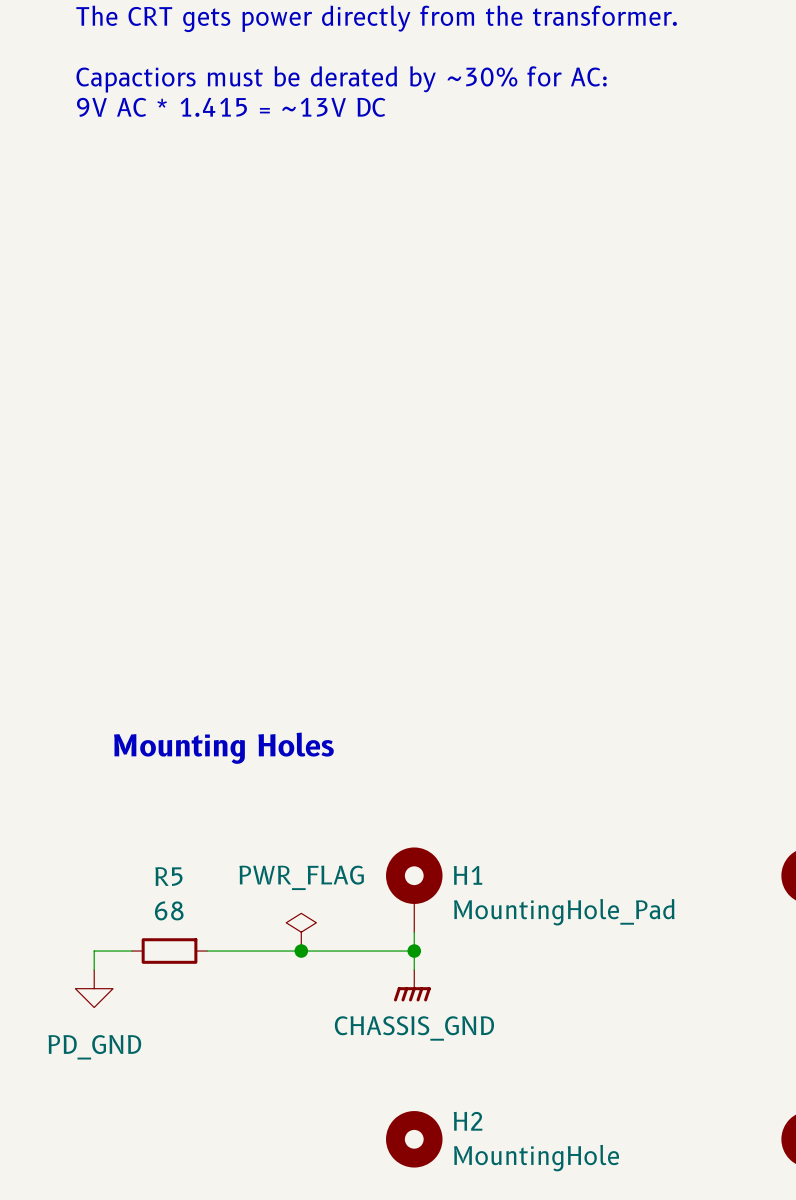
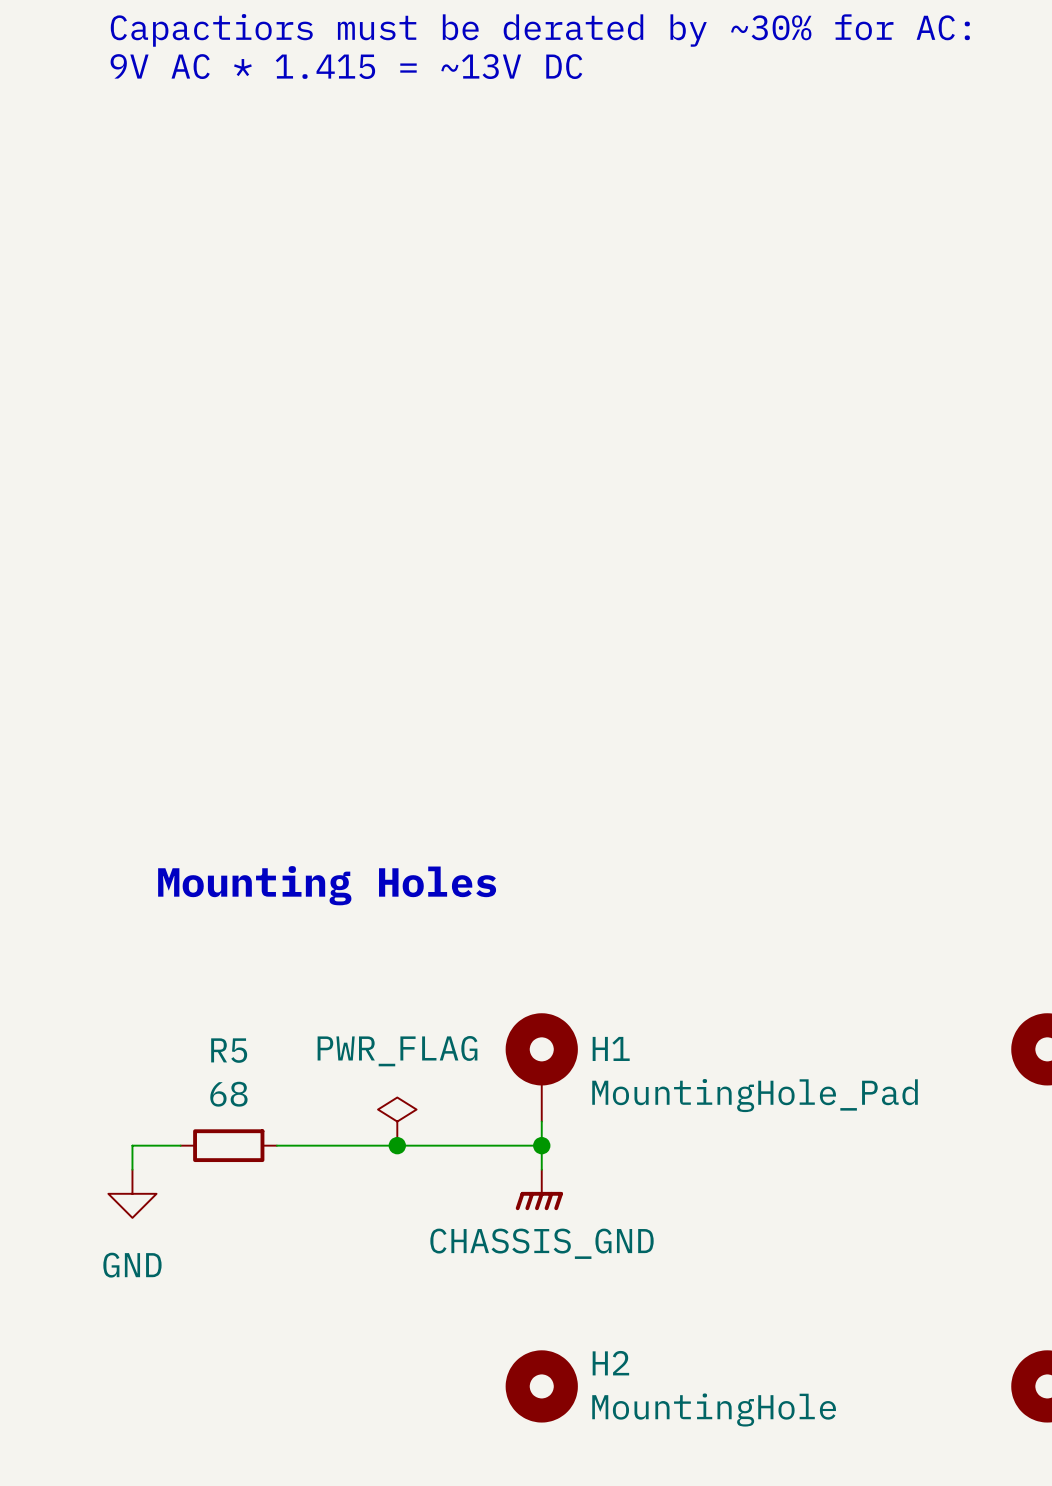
power symbol: PD_GND (94, 988) -> GND (132, 1193)

